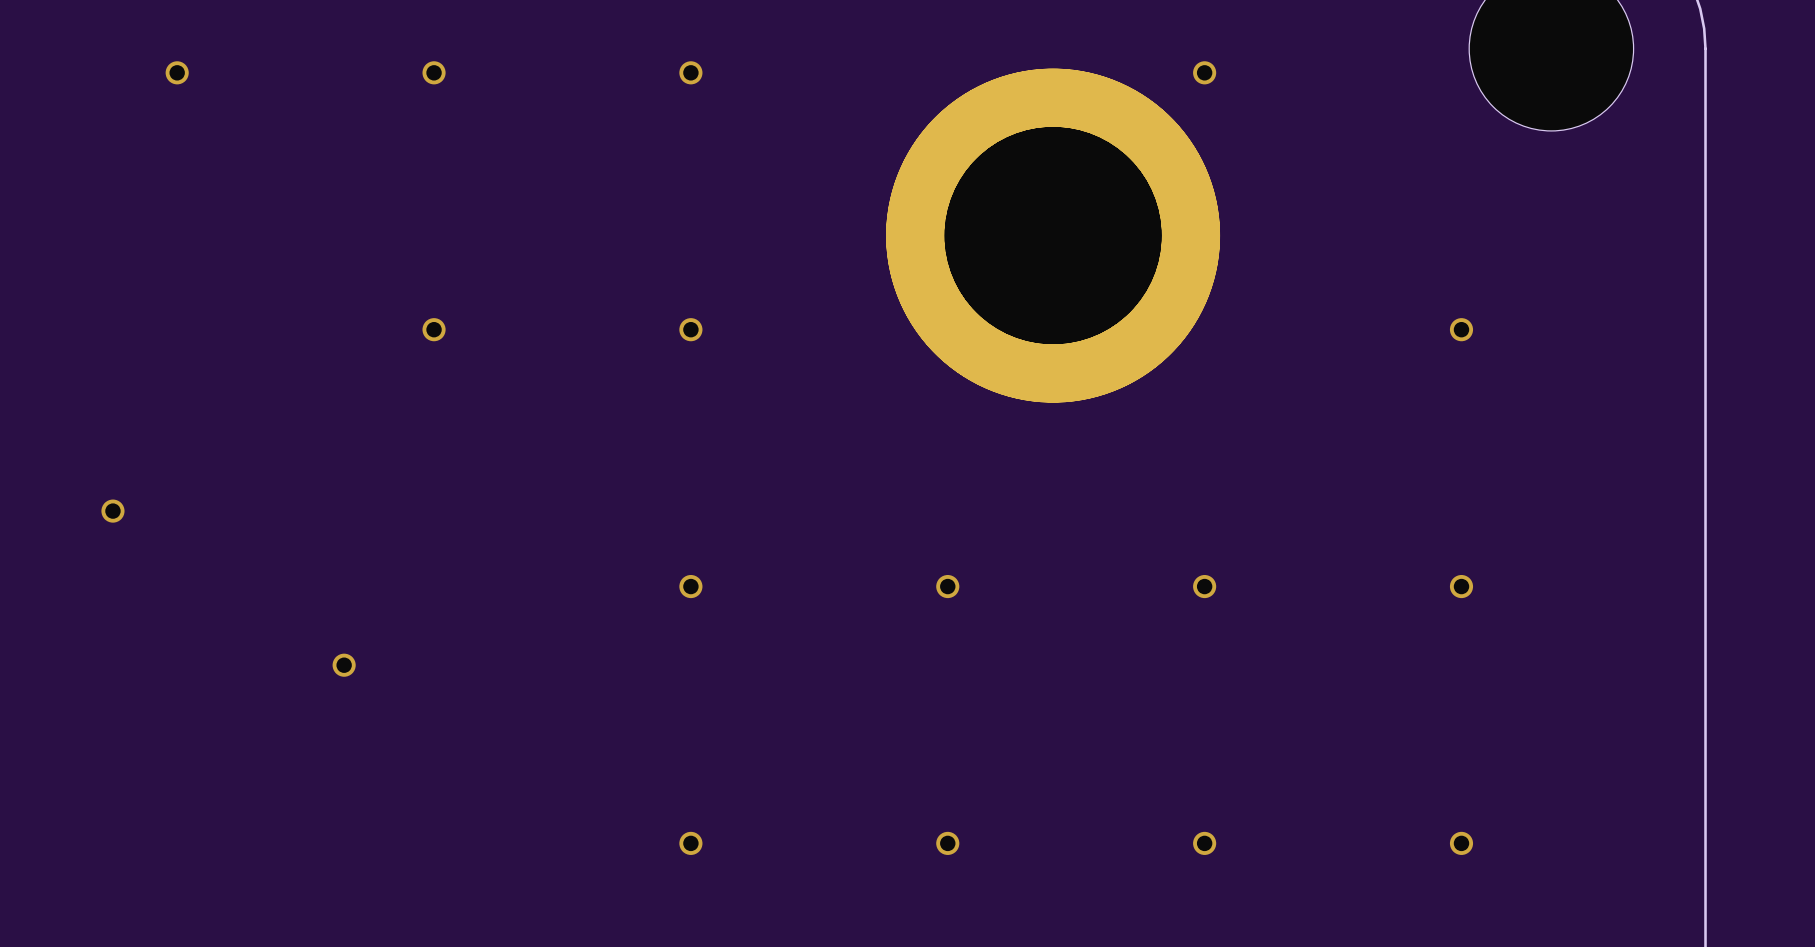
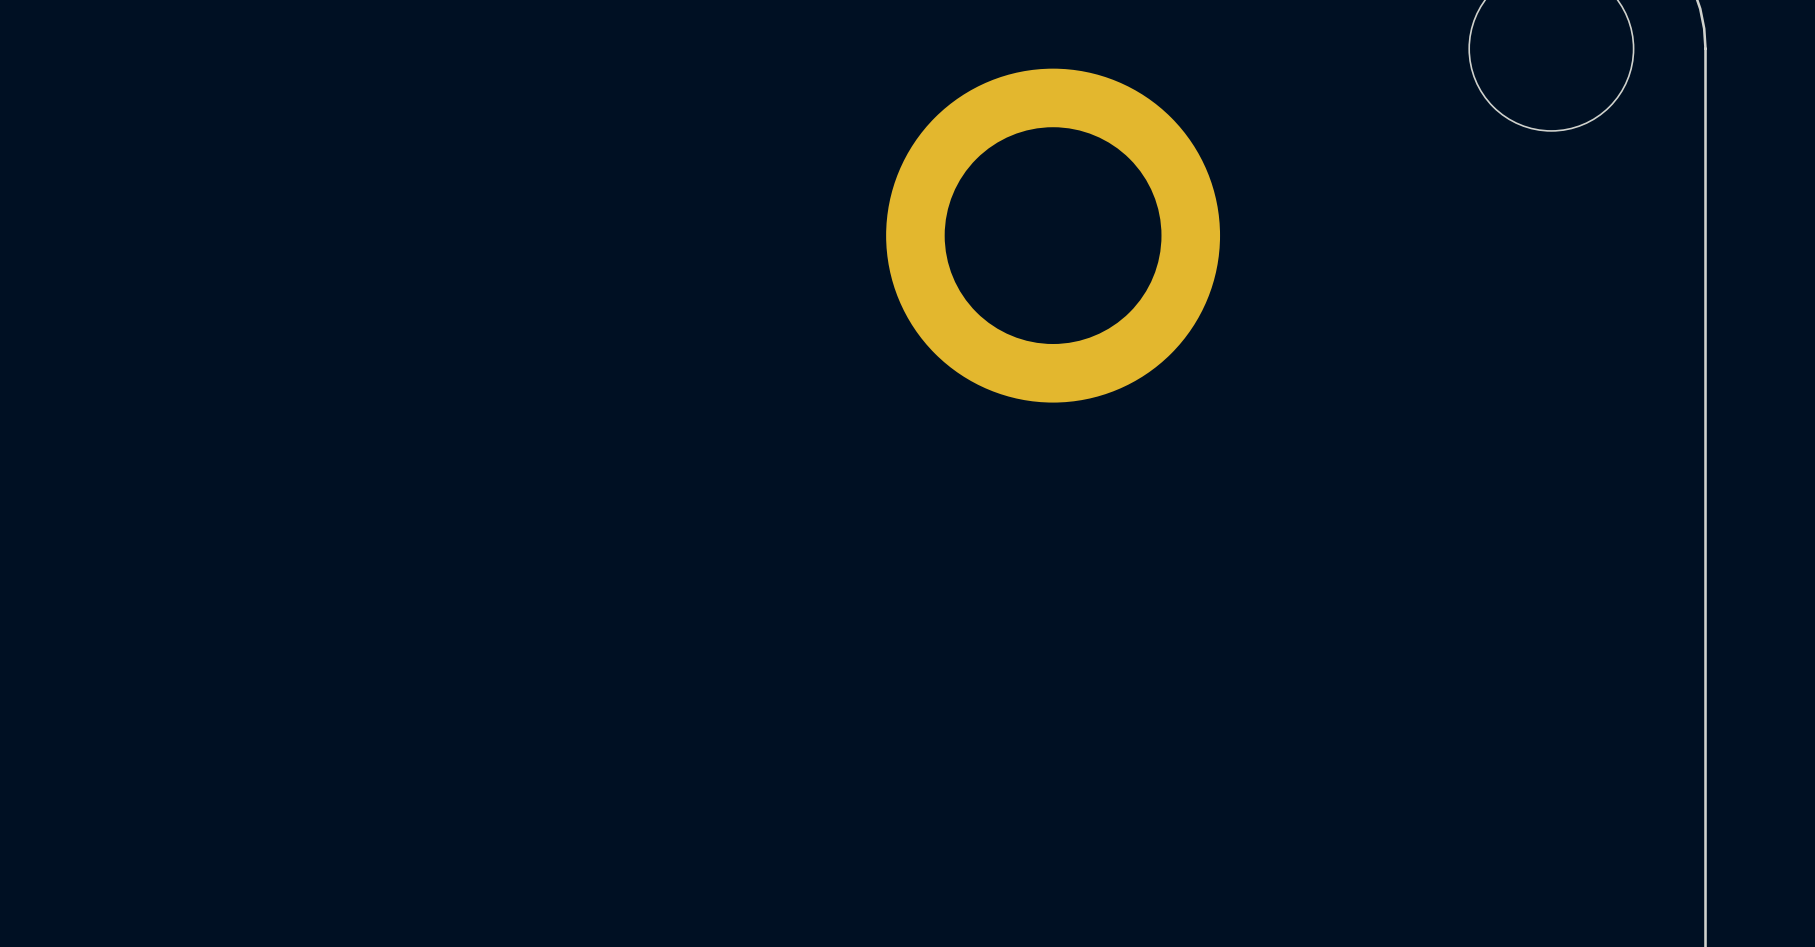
via: (177, 72) -> none
via: (434, 72) -> none
via: (690, 72) -> none
via: (1204, 72) -> none
part: (1053, 235) -> none
via: (434, 329) -> none
via: (690, 329) -> none
via: (1461, 329) -> none
via: (112, 511) -> none
via: (690, 586) -> none
via: (947, 586) -> none
via: (1204, 586) -> none
via: (1461, 586) -> none
via: (344, 665) -> none
via: (690, 843) -> none
via: (947, 843) -> none
via: (1204, 843) -> none
via: (1461, 843) -> none

